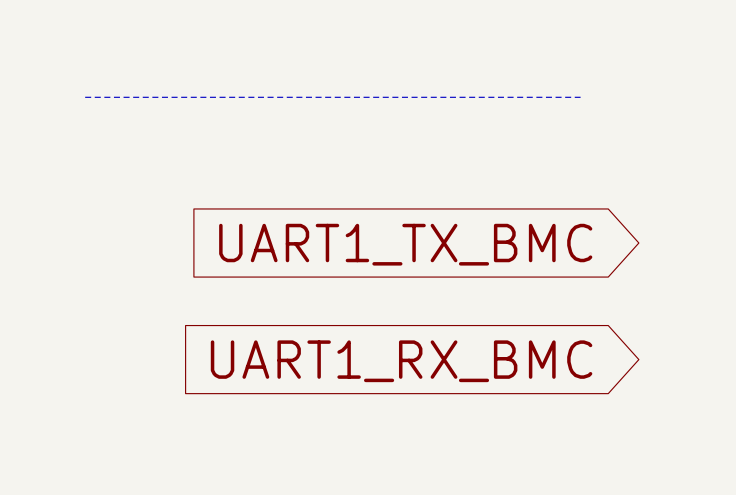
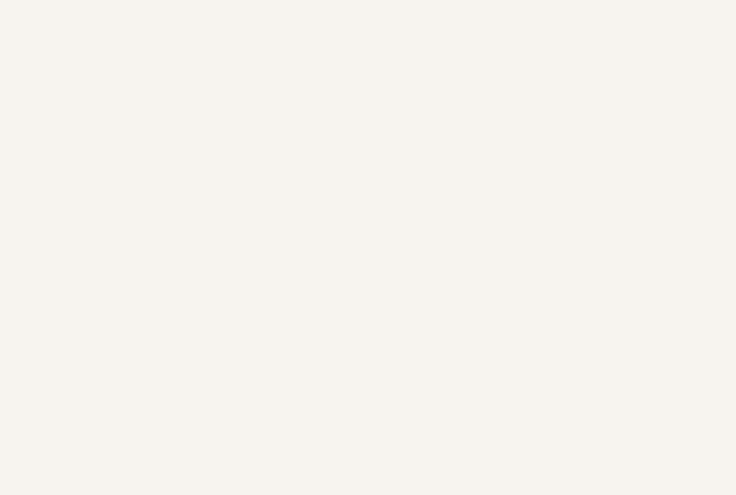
line: (85, 97) (580, 97) -> none
global label: UART1_TX_BMC (405, 244) -> none
global label: UART1_RX_BMC (401, 361) -> none

